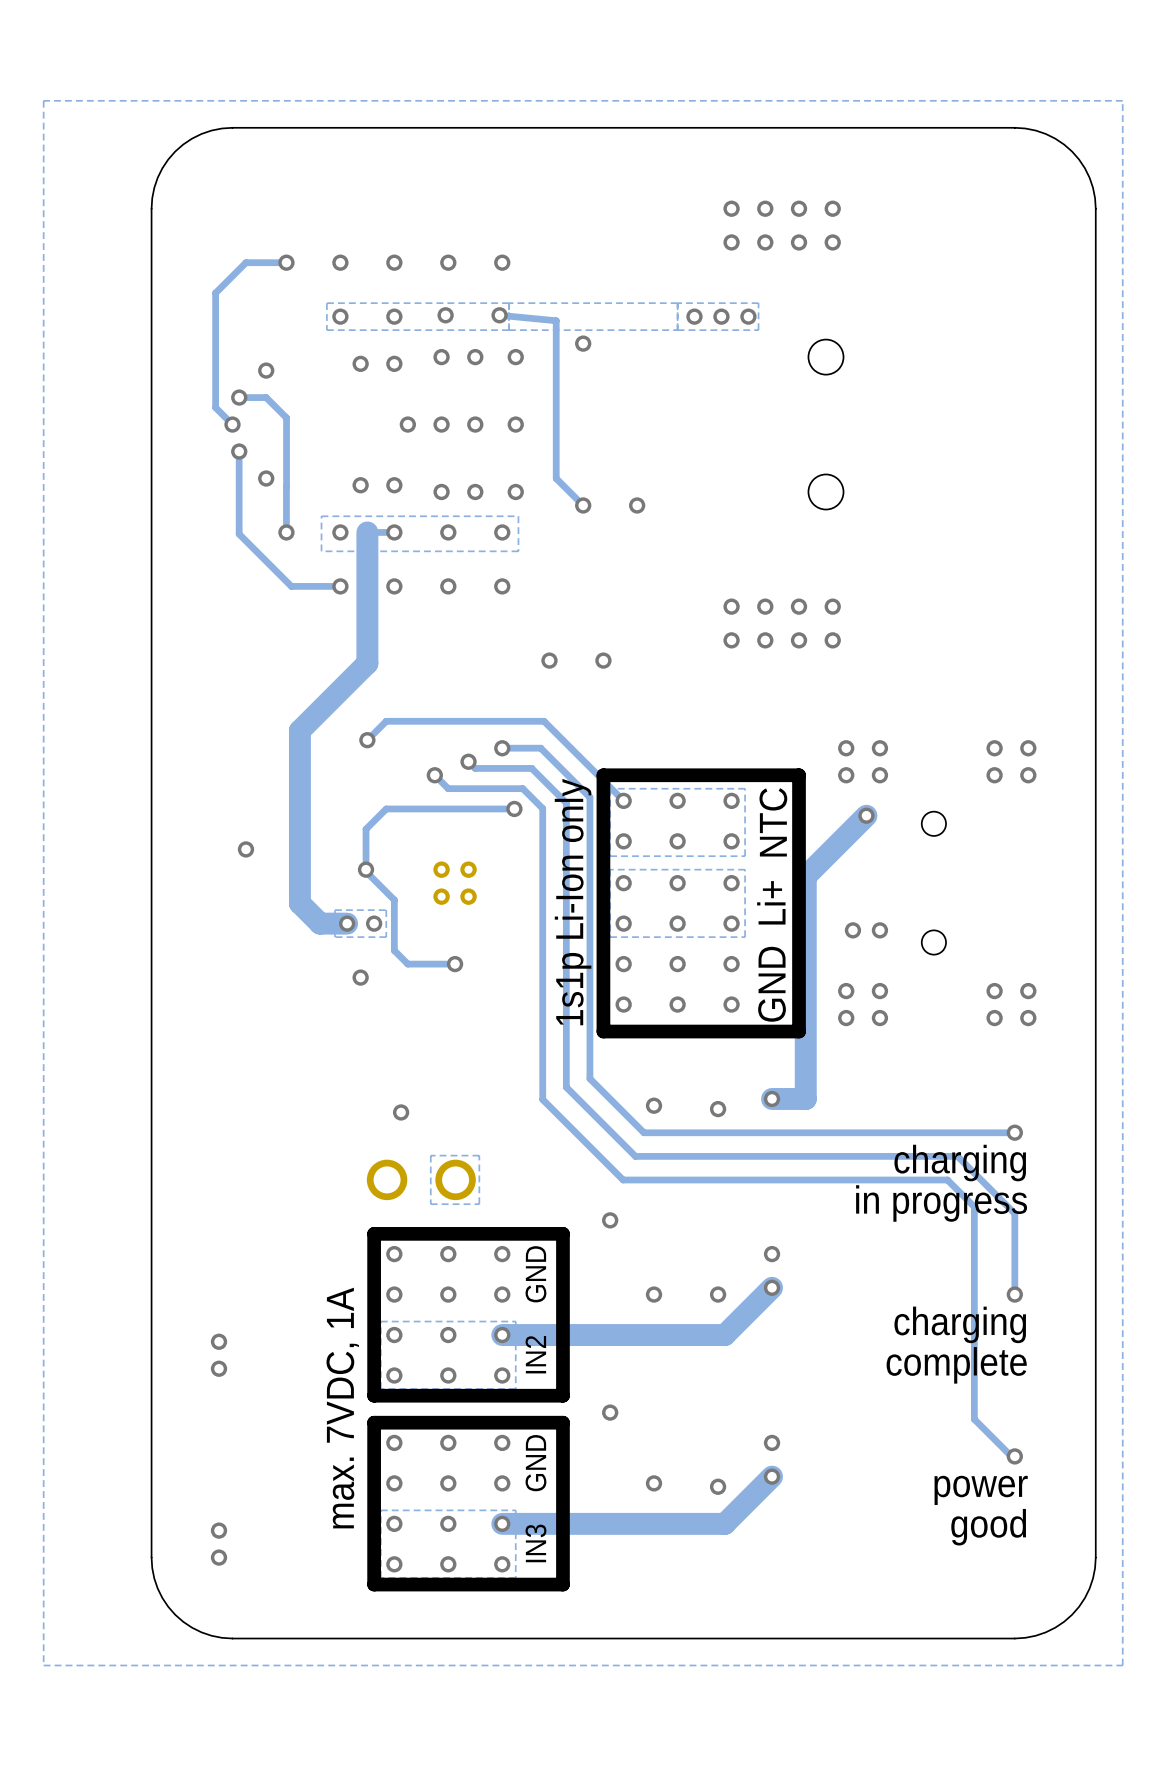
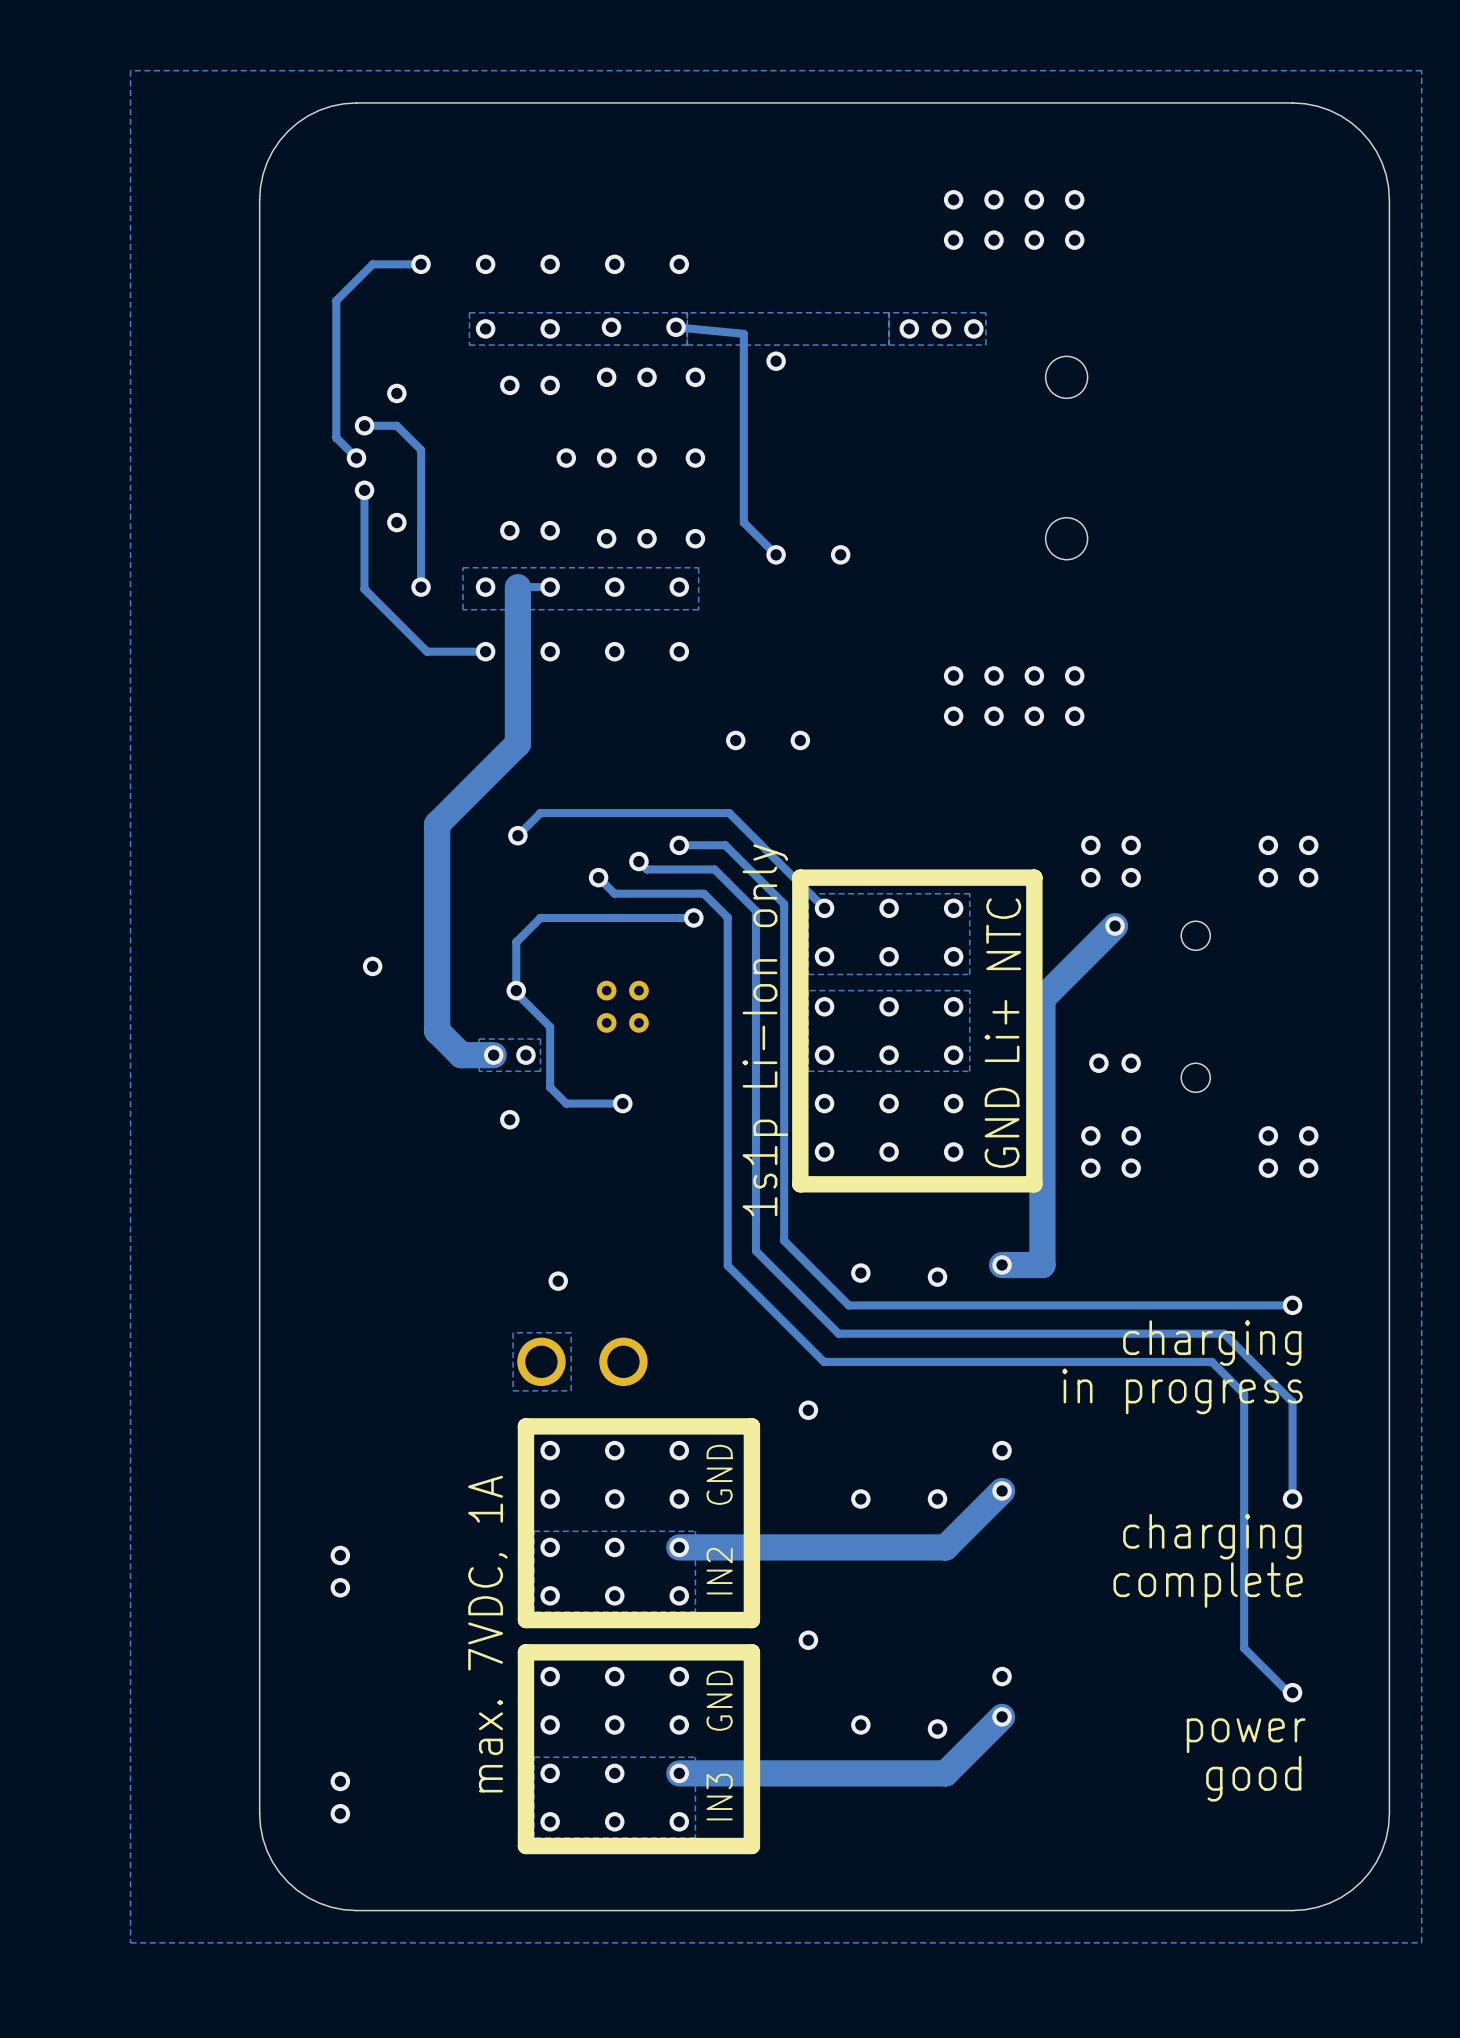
zone outline: (479, 1155) (430, 1155) (430, 1204) (479, 1204) (479, 1155) -> (571, 1332) (513, 1332) (513, 1390) (571, 1390) (571, 1332)

